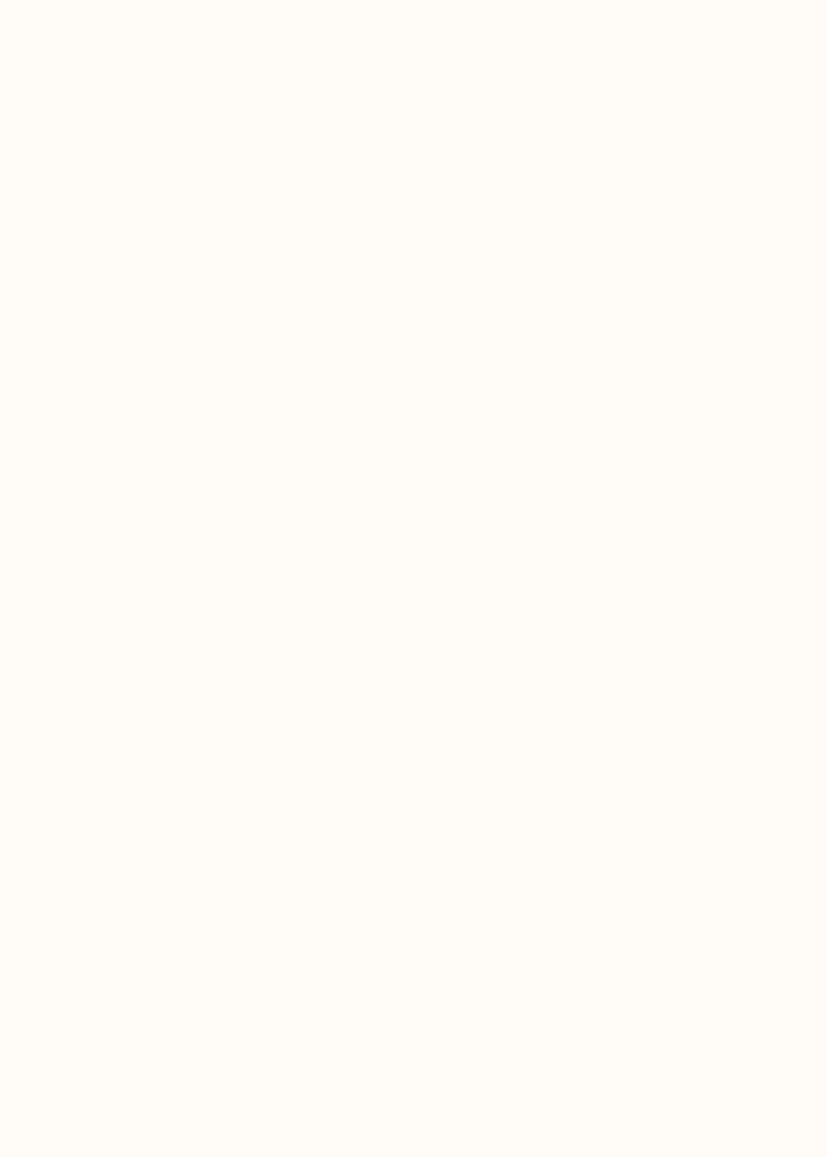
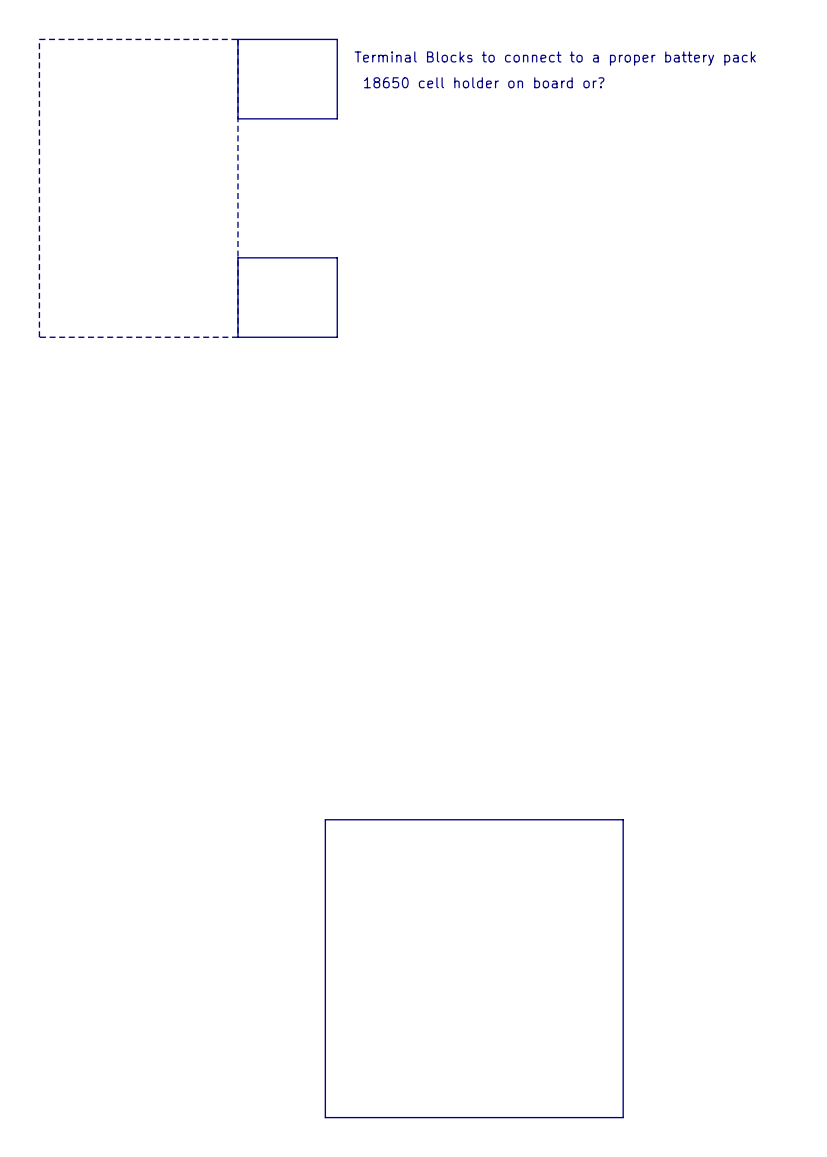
line: none -> (237, 39) (237, 118) (337, 118) (337, 39) (237, 39)
line: none -> (237, 39) (39, 39) (39, 337) (237, 337)
line: none -> (237, 39) (237, 337)
text: none -> Terminal Blocks to connect to a proper battery pack (555, 58)
text: none -> 18650 cell holder on board or? (484, 82)
line: none -> (237, 337) (337, 337) (337, 257) (237, 257) (237, 337)
line: none -> (325, 819) (623, 819) (623, 1117) (325, 1117) (325, 819)

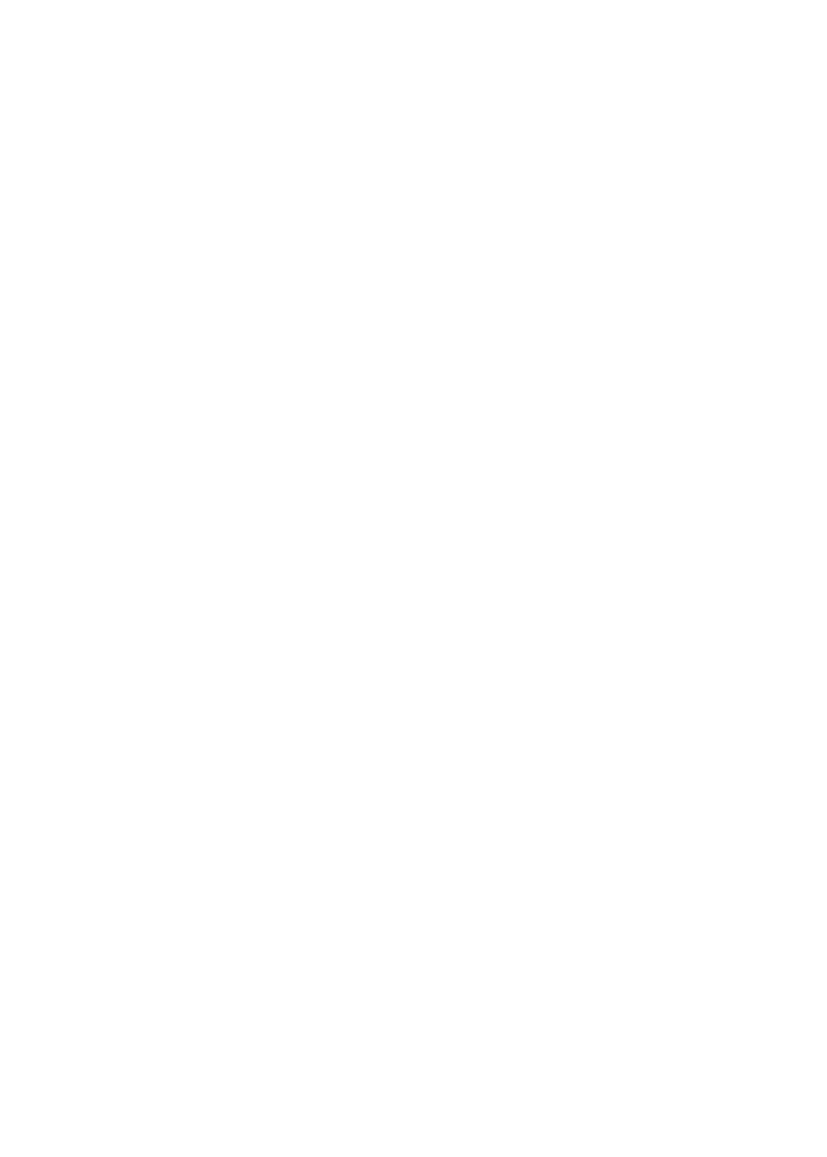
line: (237, 39) (237, 118) (337, 118) (337, 39) (237, 39) -> none
line: (237, 39) (39, 39) (39, 337) (237, 337) -> none
line: (237, 39) (237, 337) -> none
text: Terminal Blocks to connect to a proper battery pack (555, 58) -> none
text: 18650 cell holder on board or? (484, 82) -> none
line: (237, 337) (337, 337) (337, 257) (237, 257) (237, 337) -> none
line: (325, 819) (623, 819) (623, 1117) (325, 1117) (325, 819) -> none

